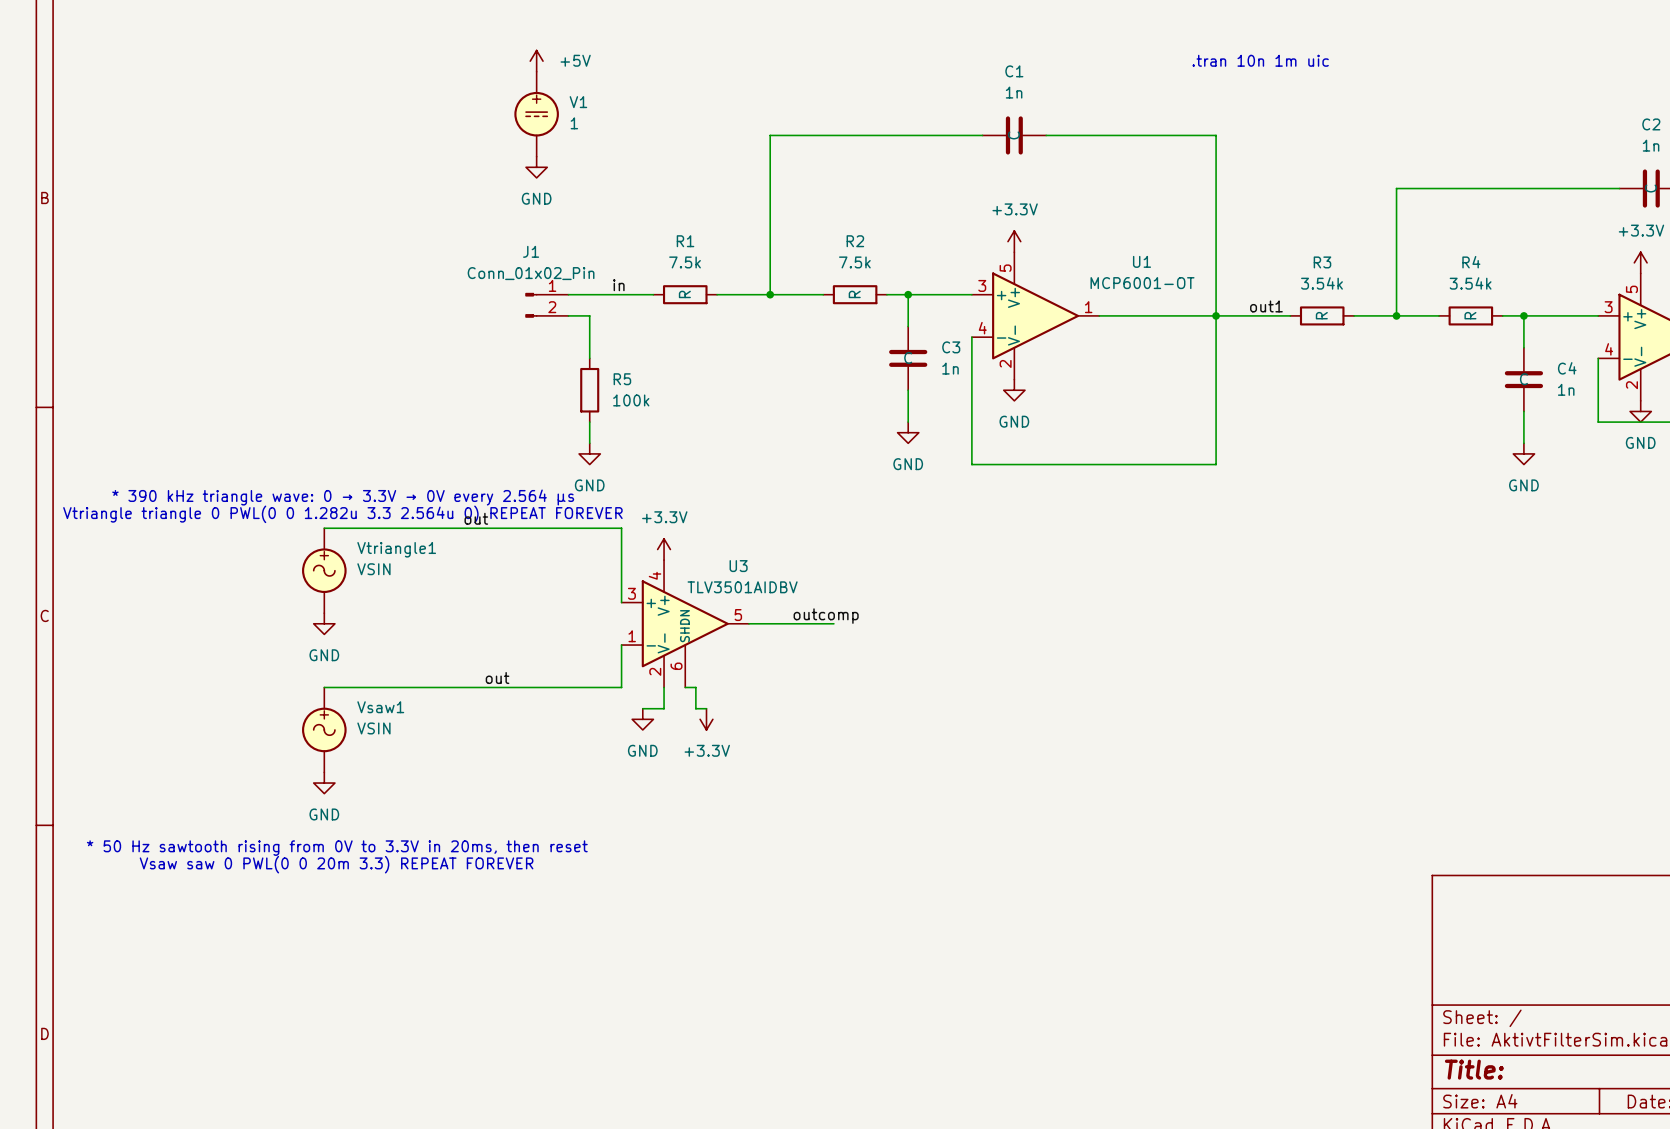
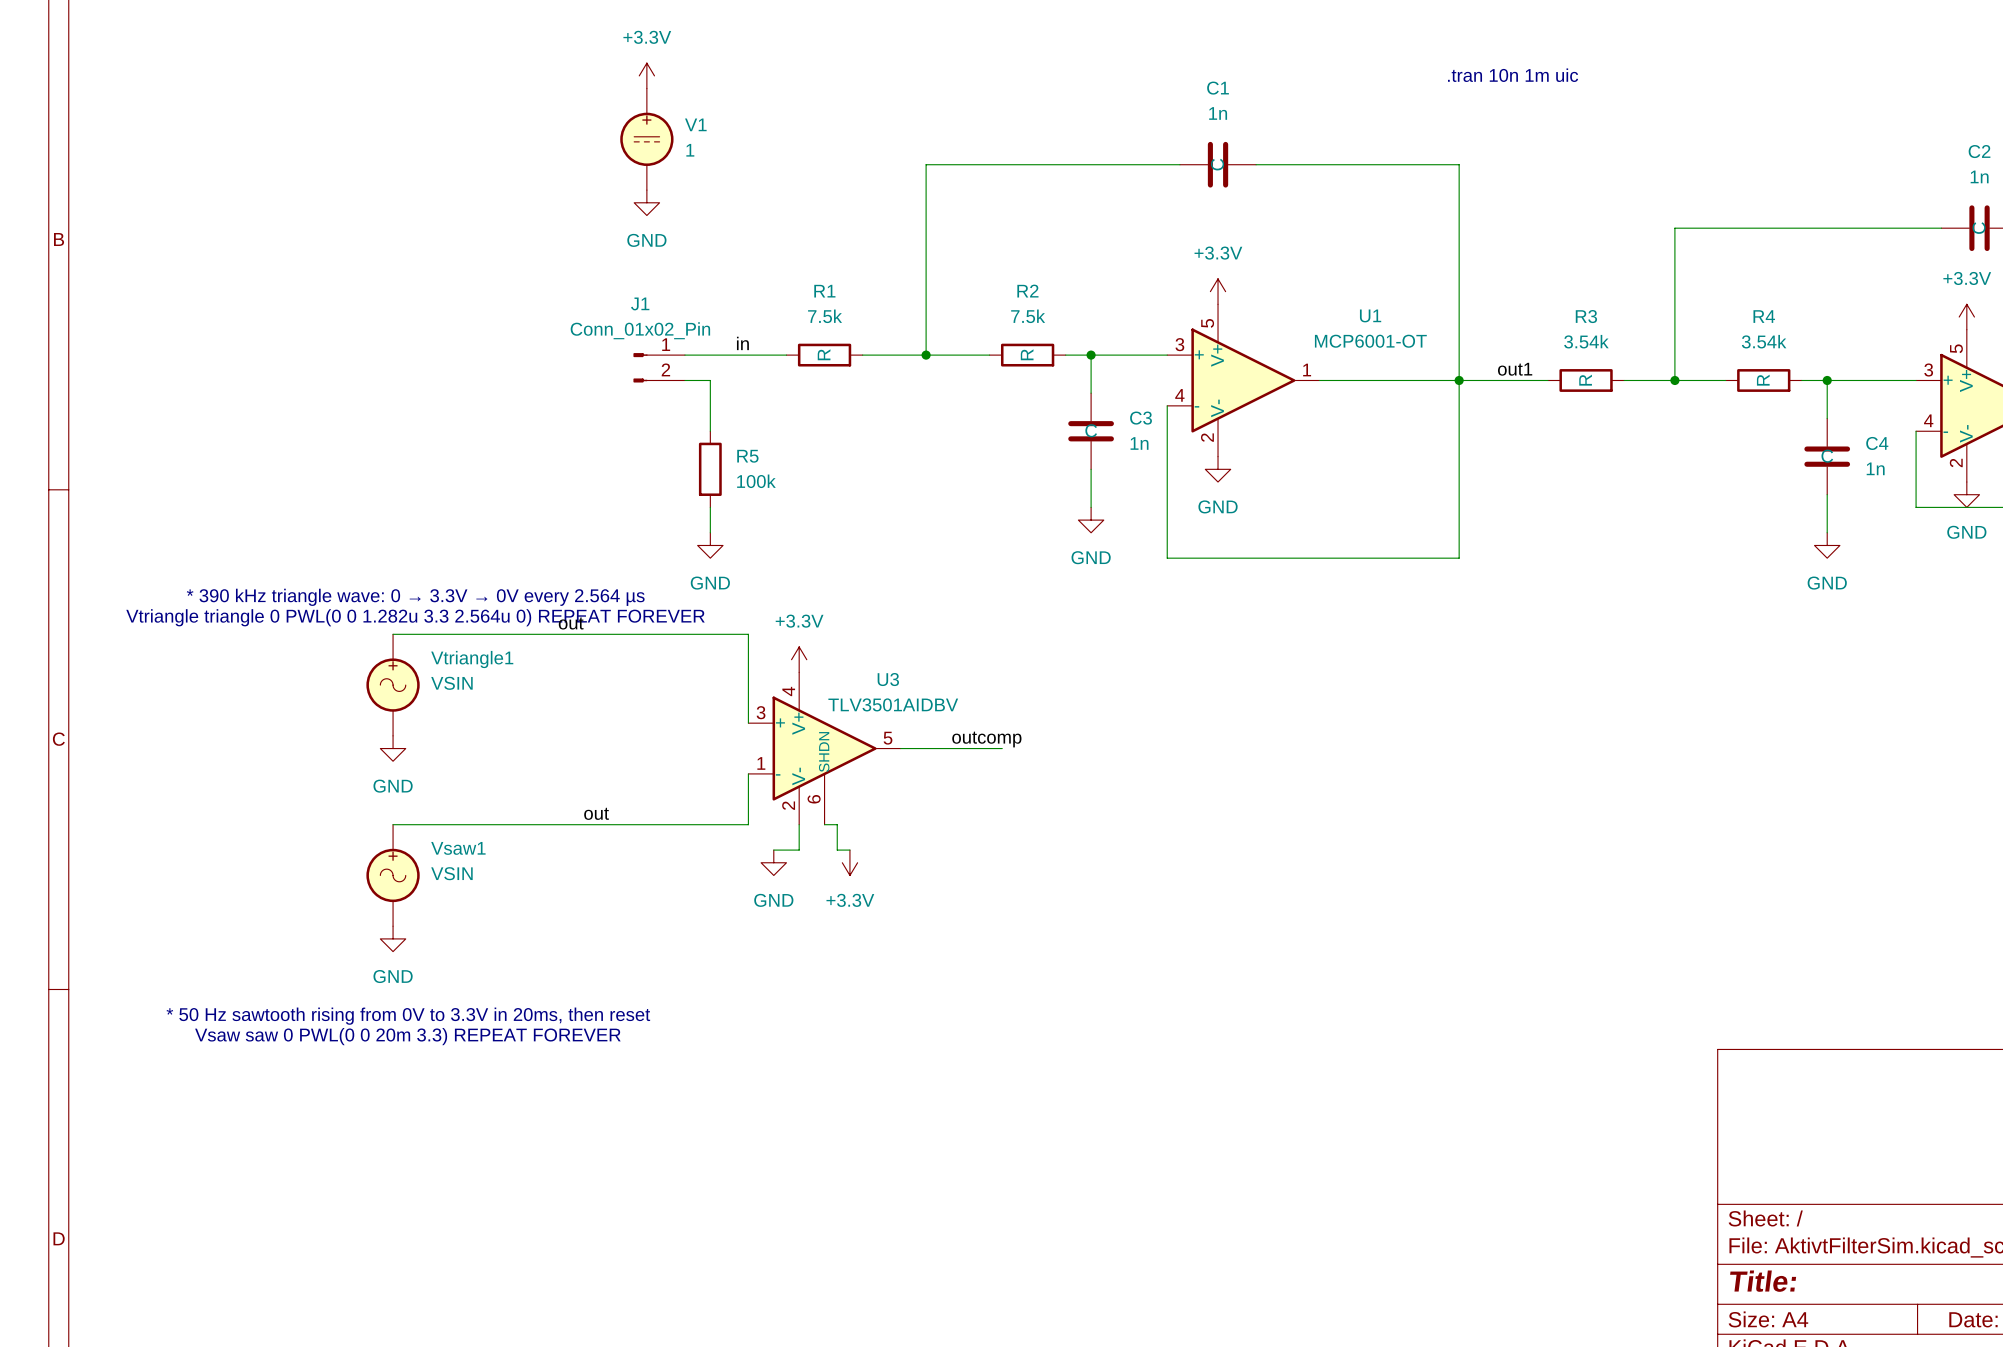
power symbol: +5V (536, 61) -> +3.3V (646, 75)

